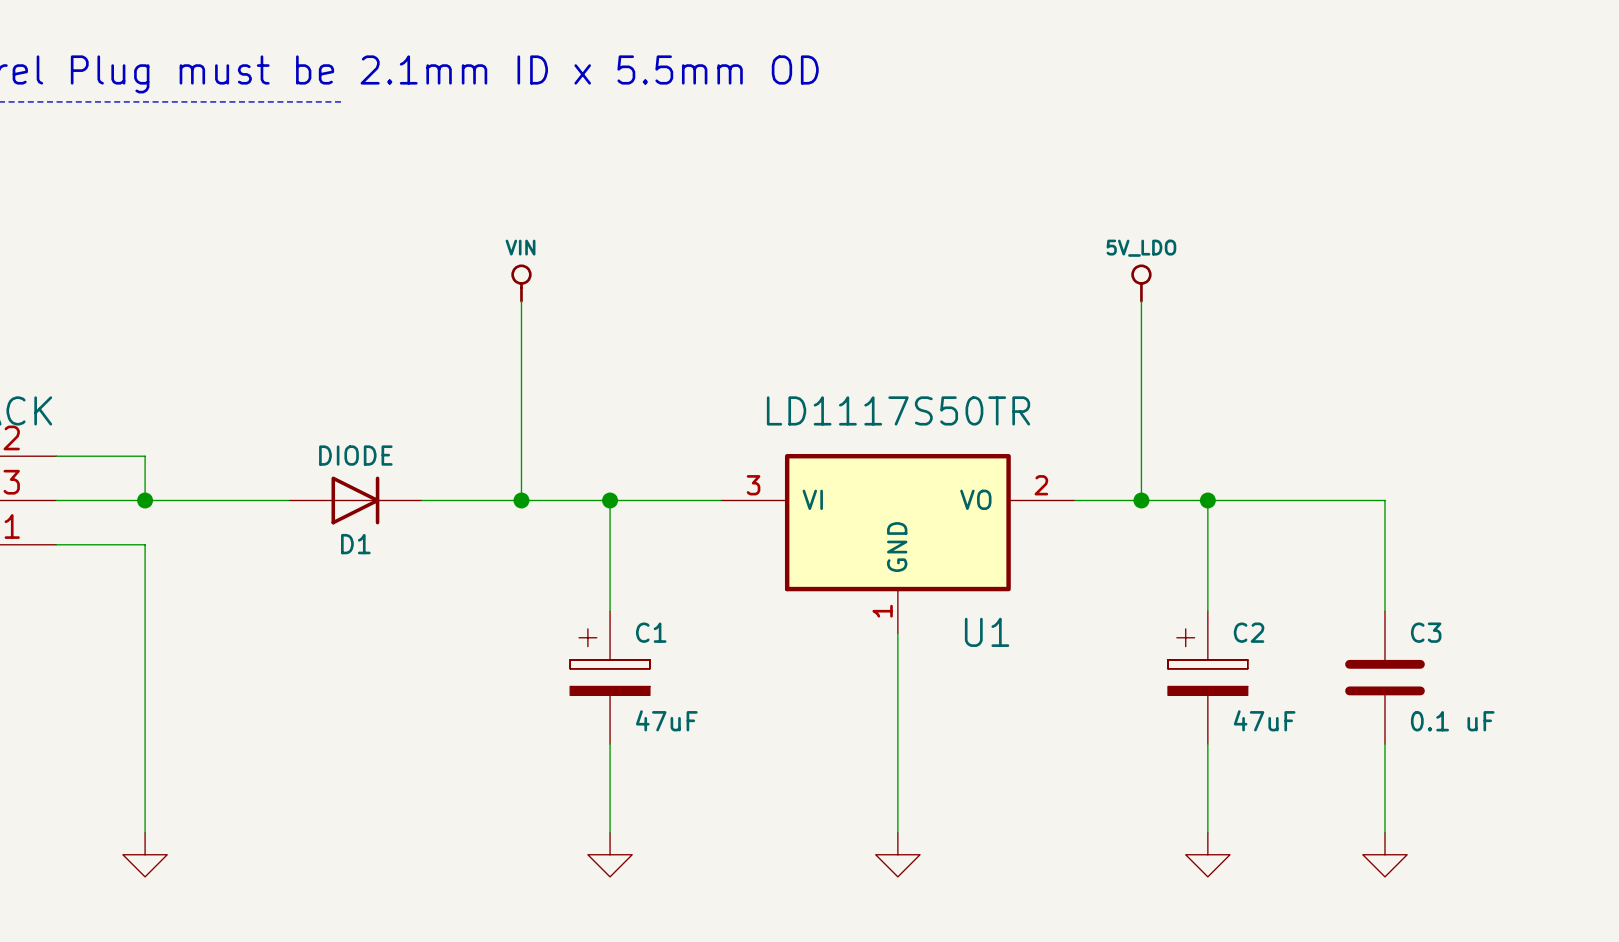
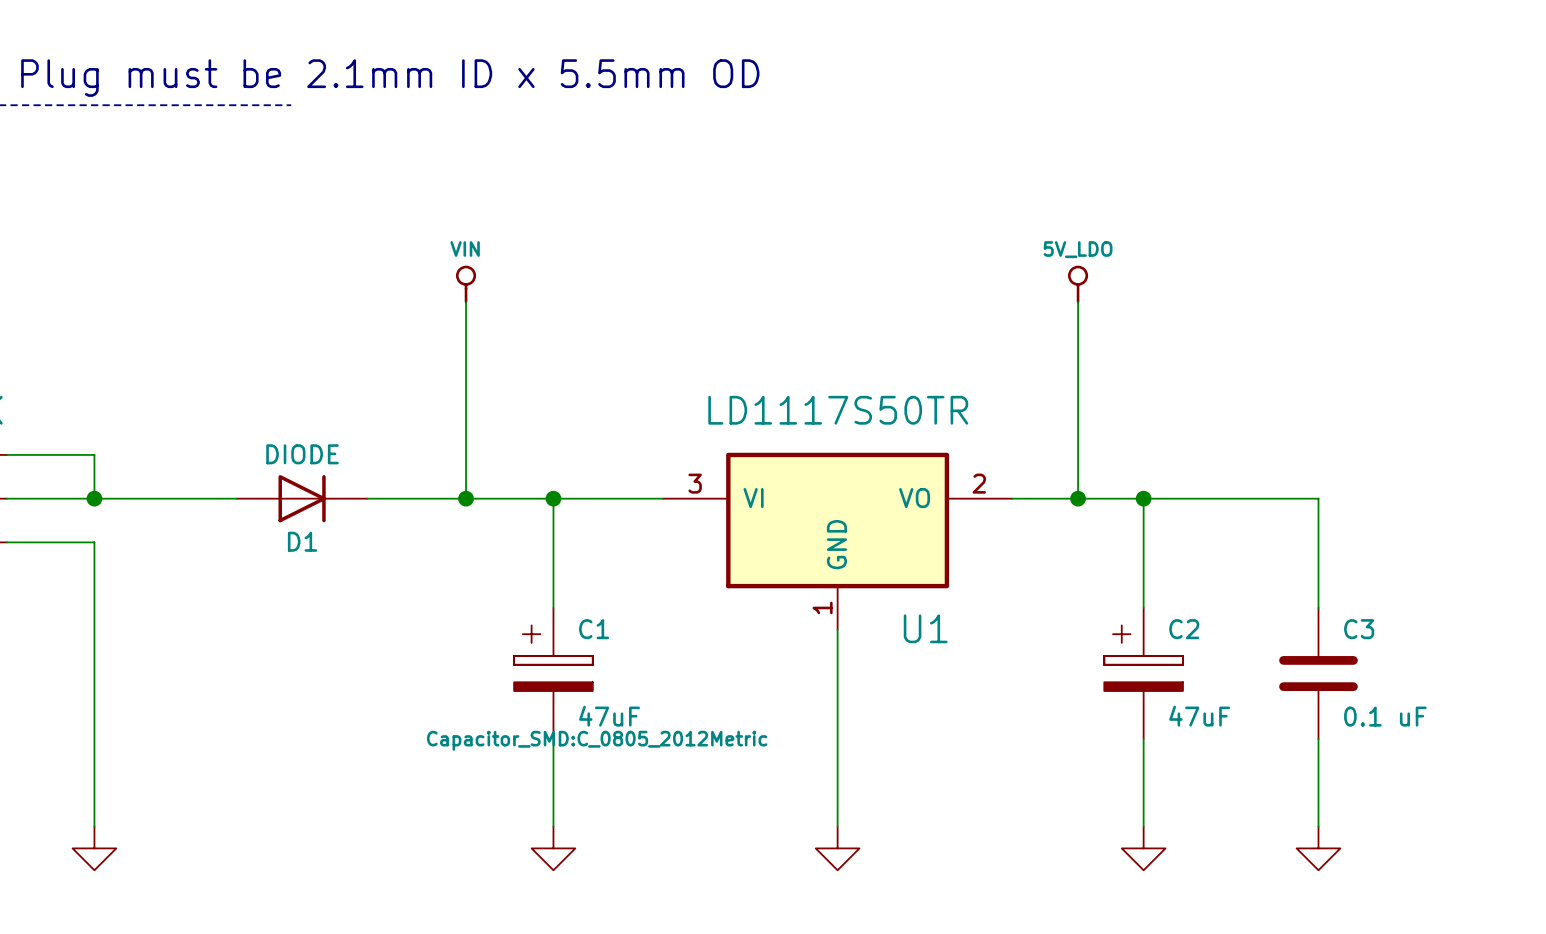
C1 text: none -> Capacitor_SMD:C_0805_2012Metric (597, 740)

